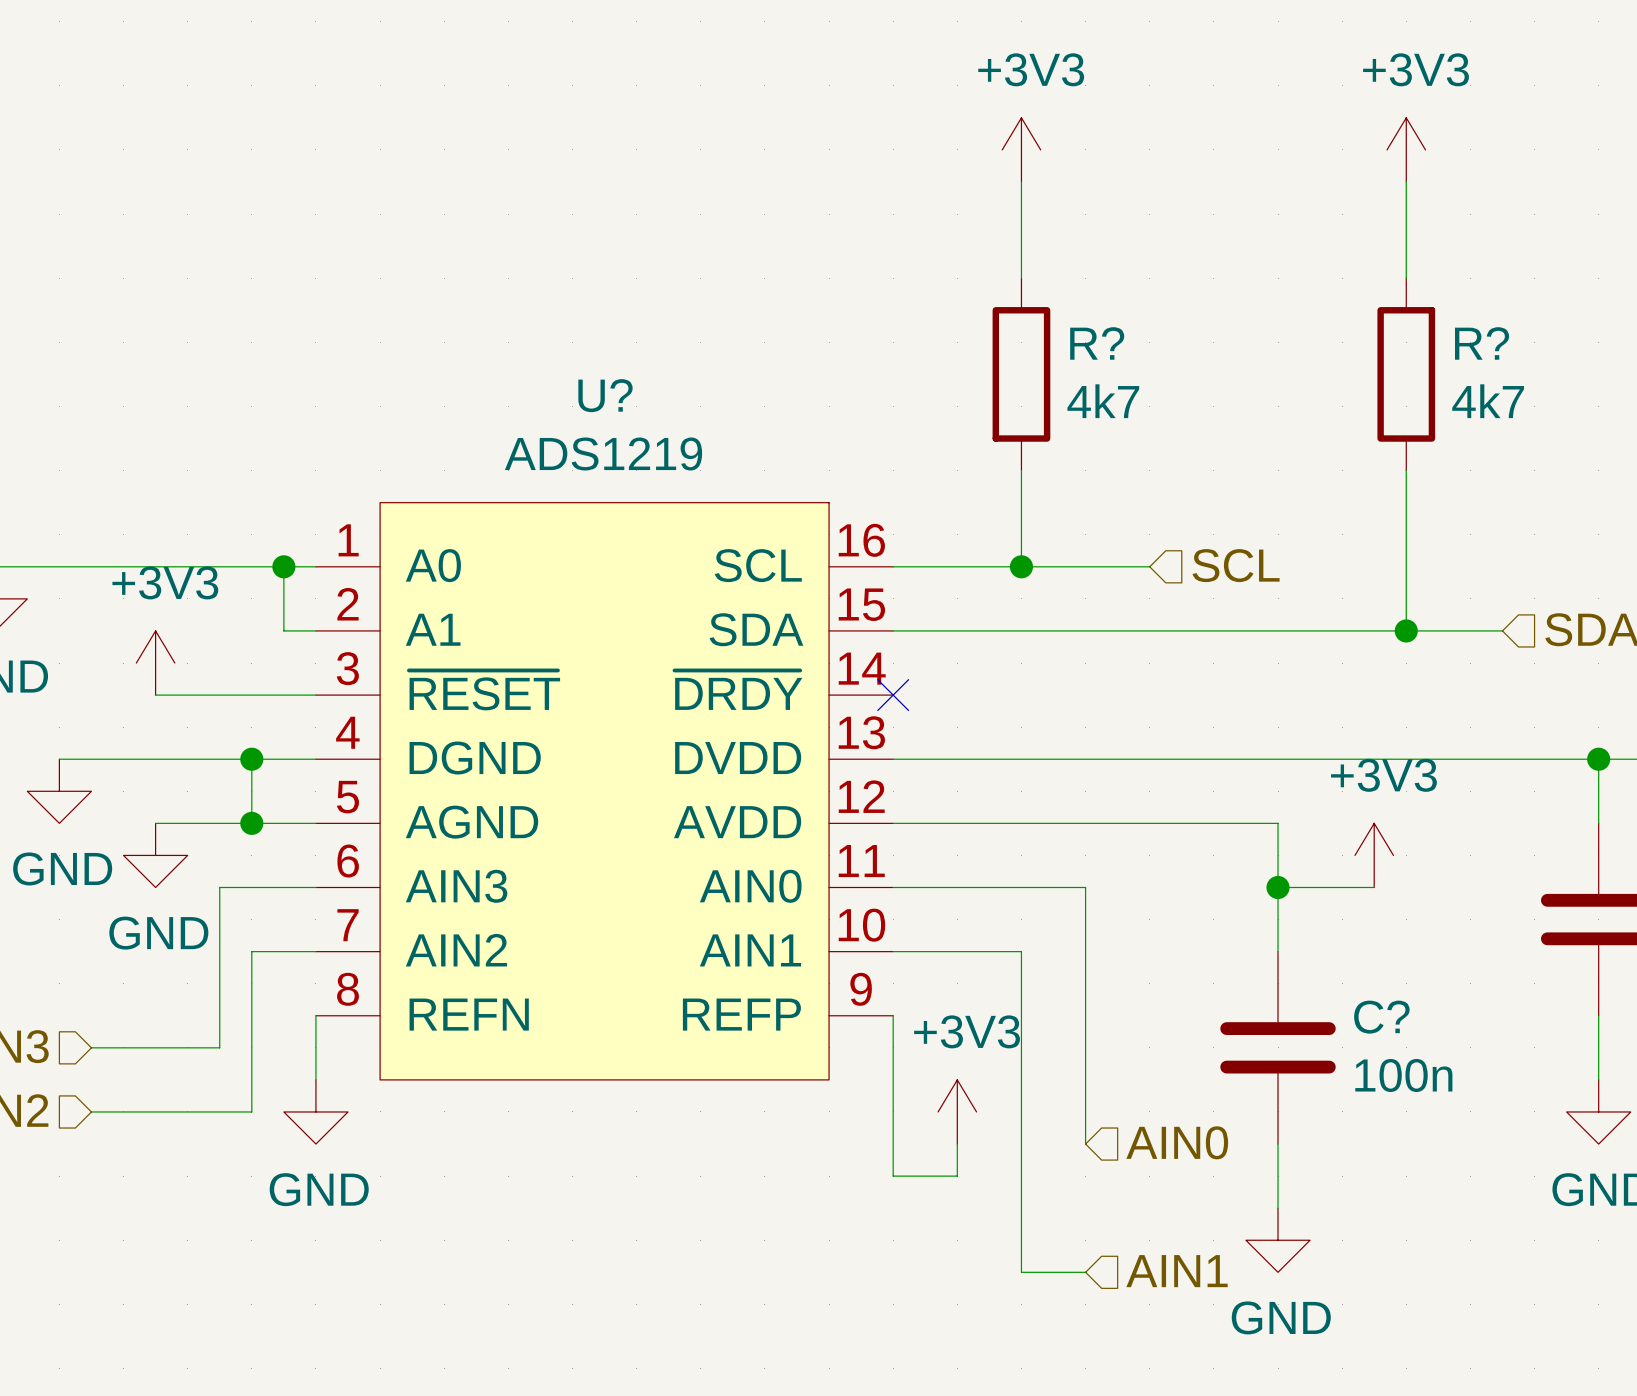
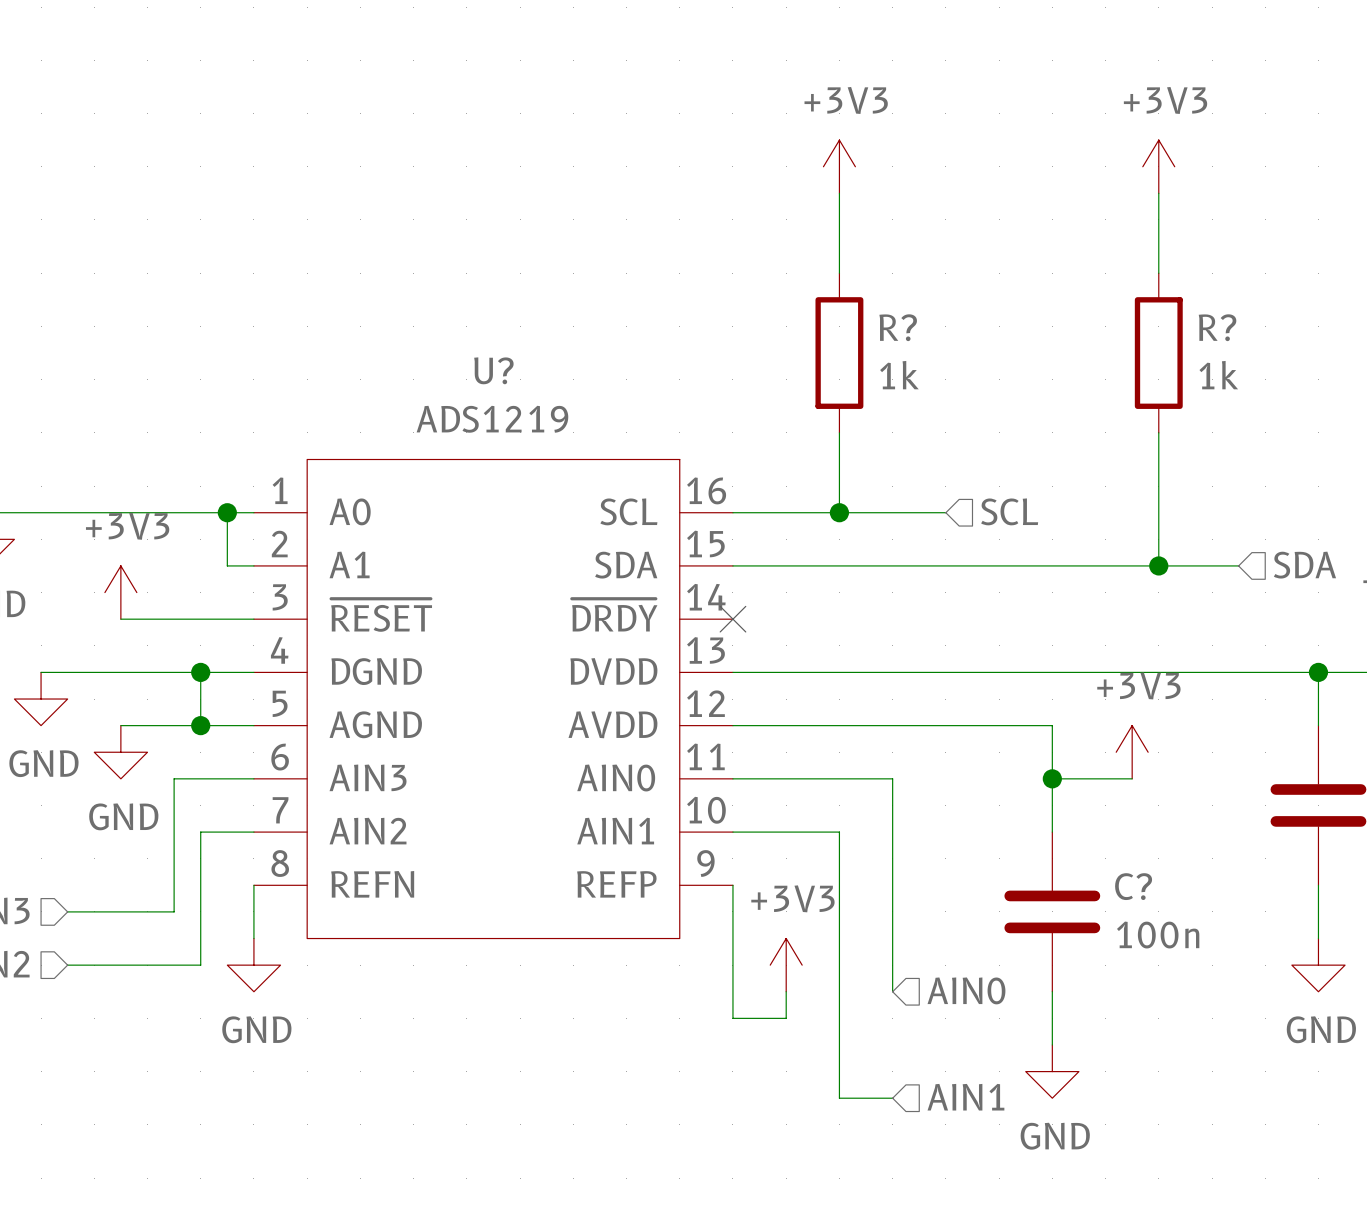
R? value: 4k7 (1103, 401) -> 1k (899, 375)
R? value: 4k7 (1488, 401) -> 1k (1218, 375)

